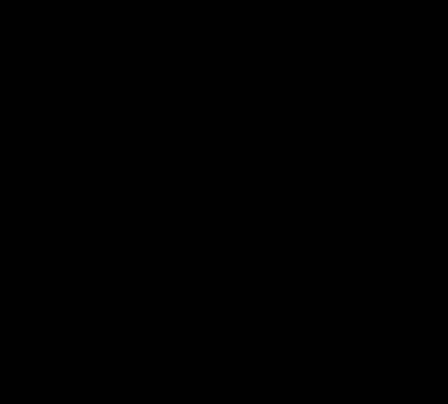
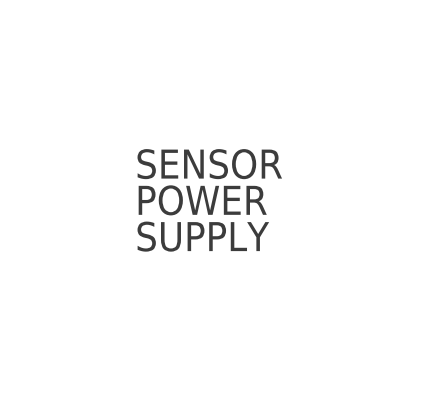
text: none -> SENSOR (209, 164)
text: none -> POWER (202, 200)
text: none -> SUPPLY (203, 236)

